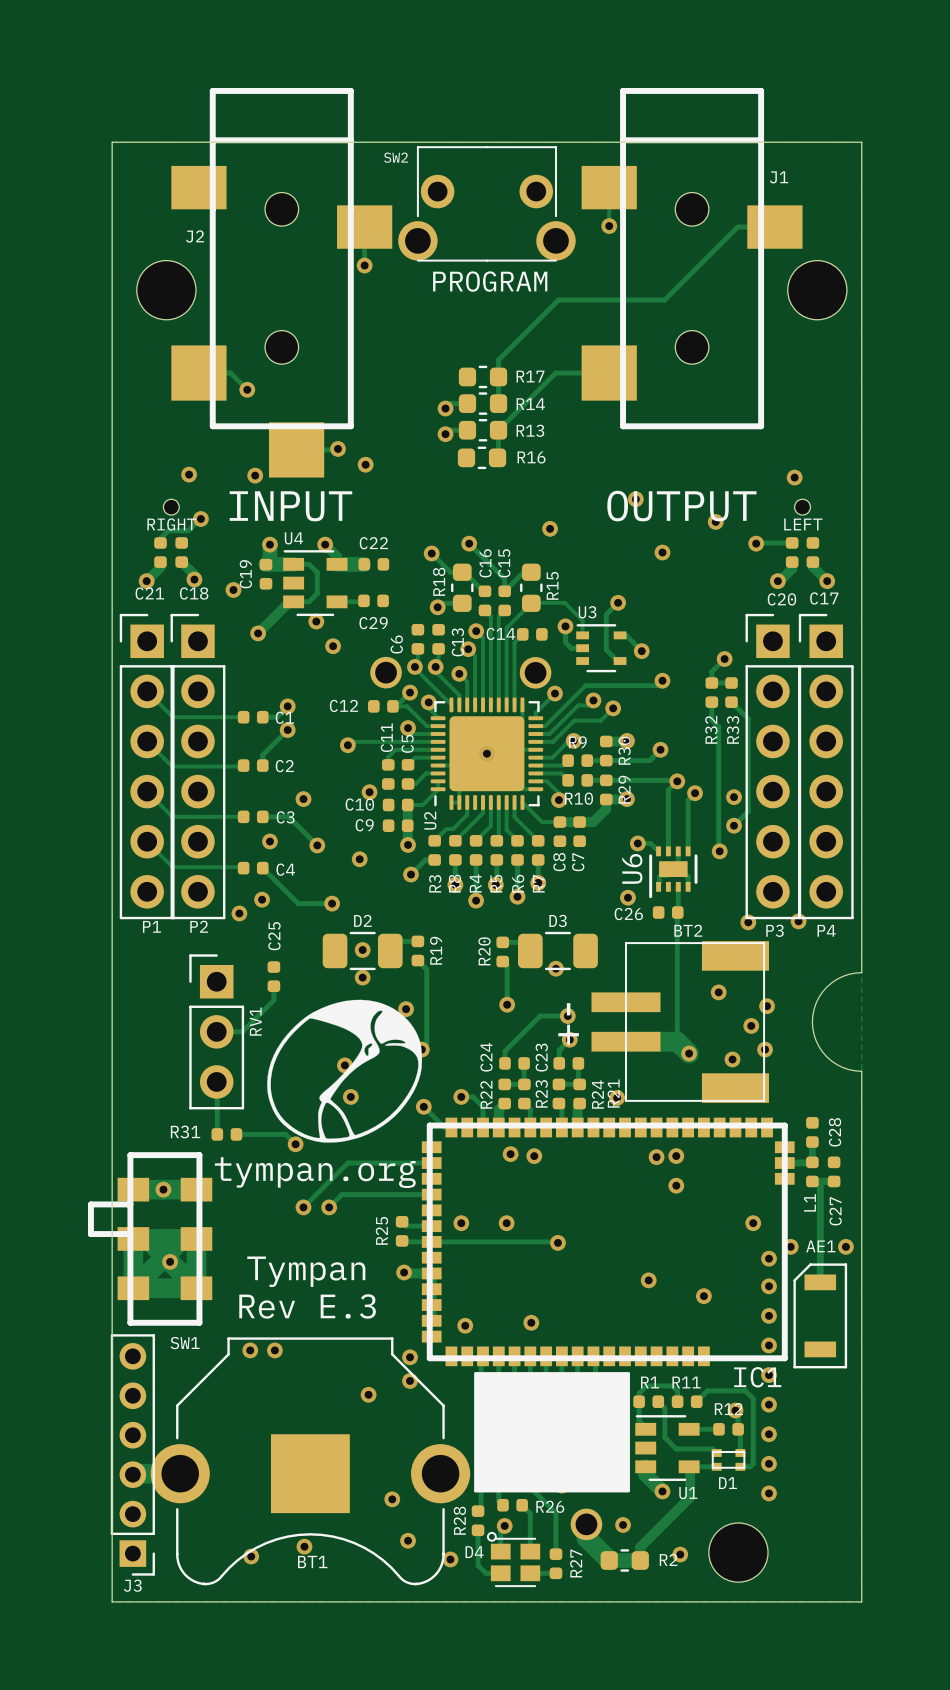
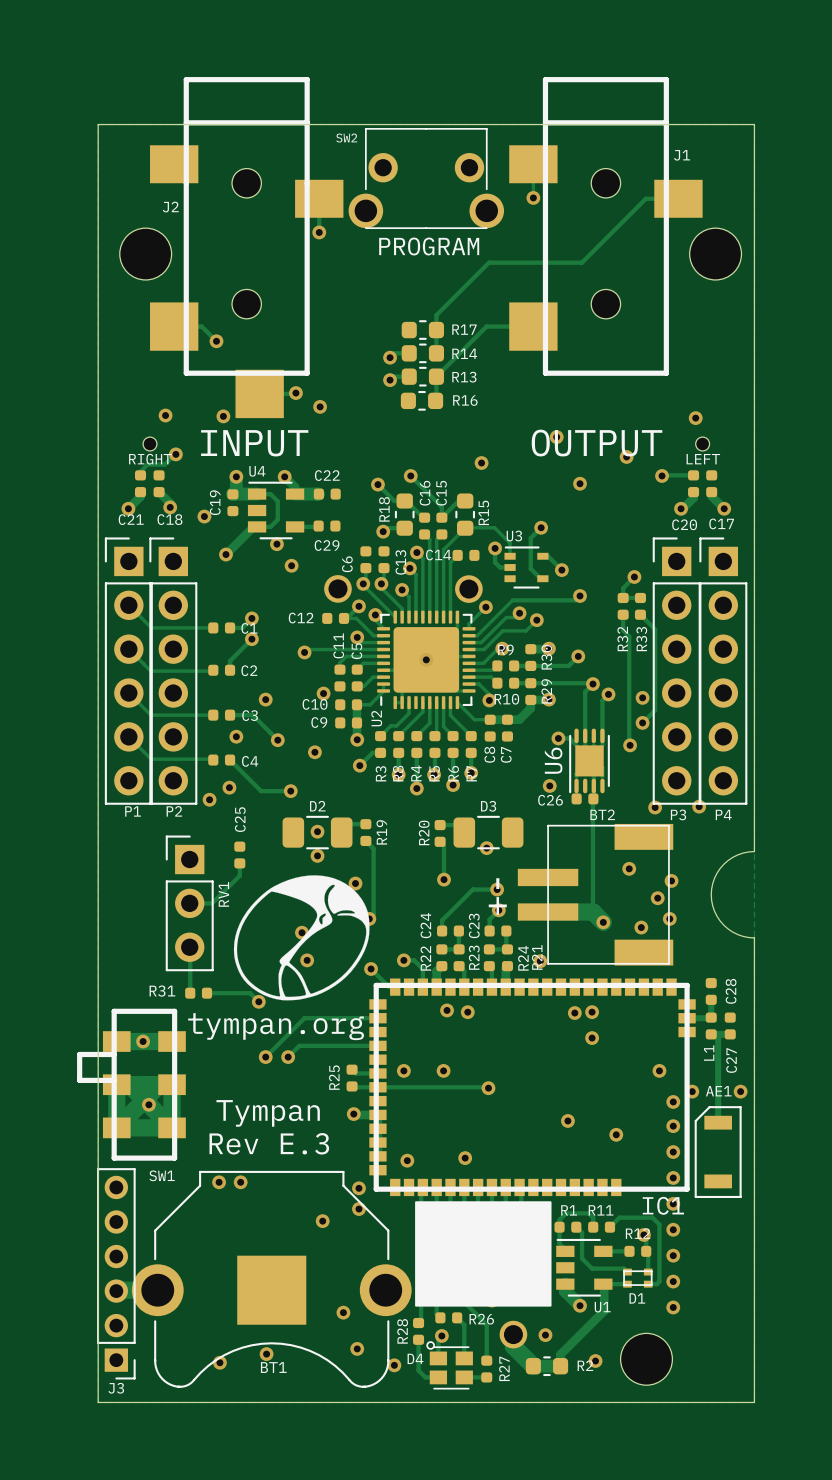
U6 footprint: [649, 846, 698, 899] -> [569, 728, 610, 794]

